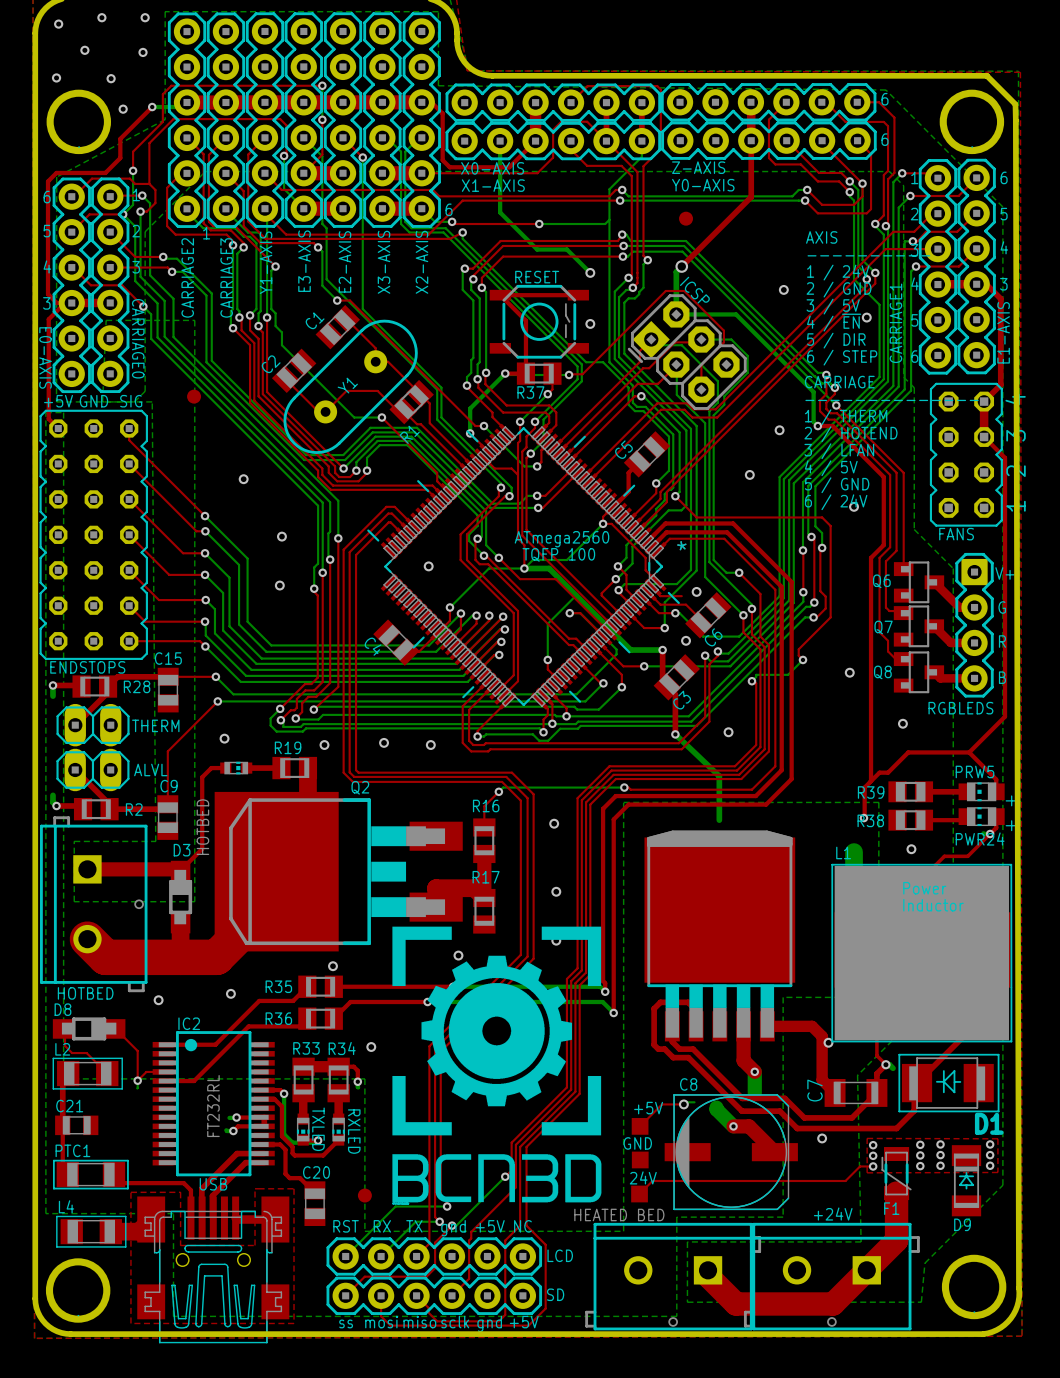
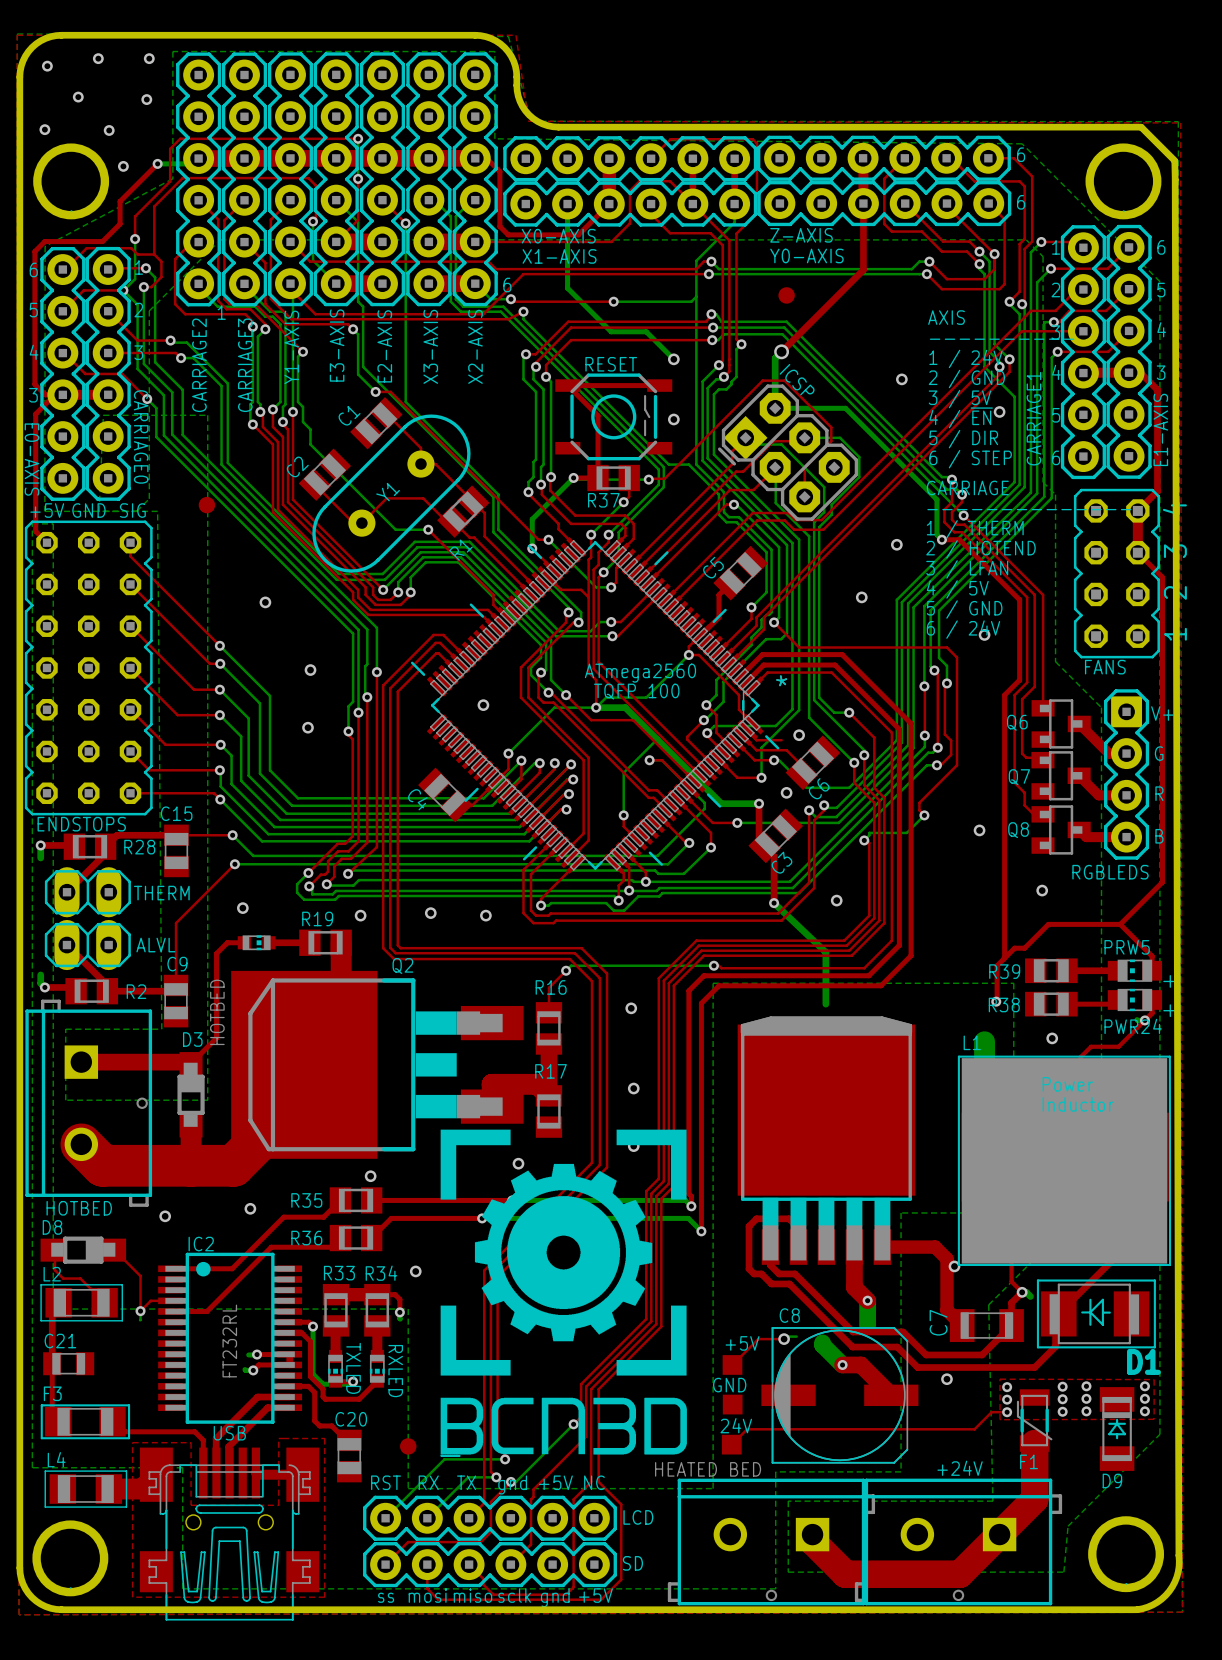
PTC1 name: PTC1 (72, 1150) -> F3 (52, 1393)

